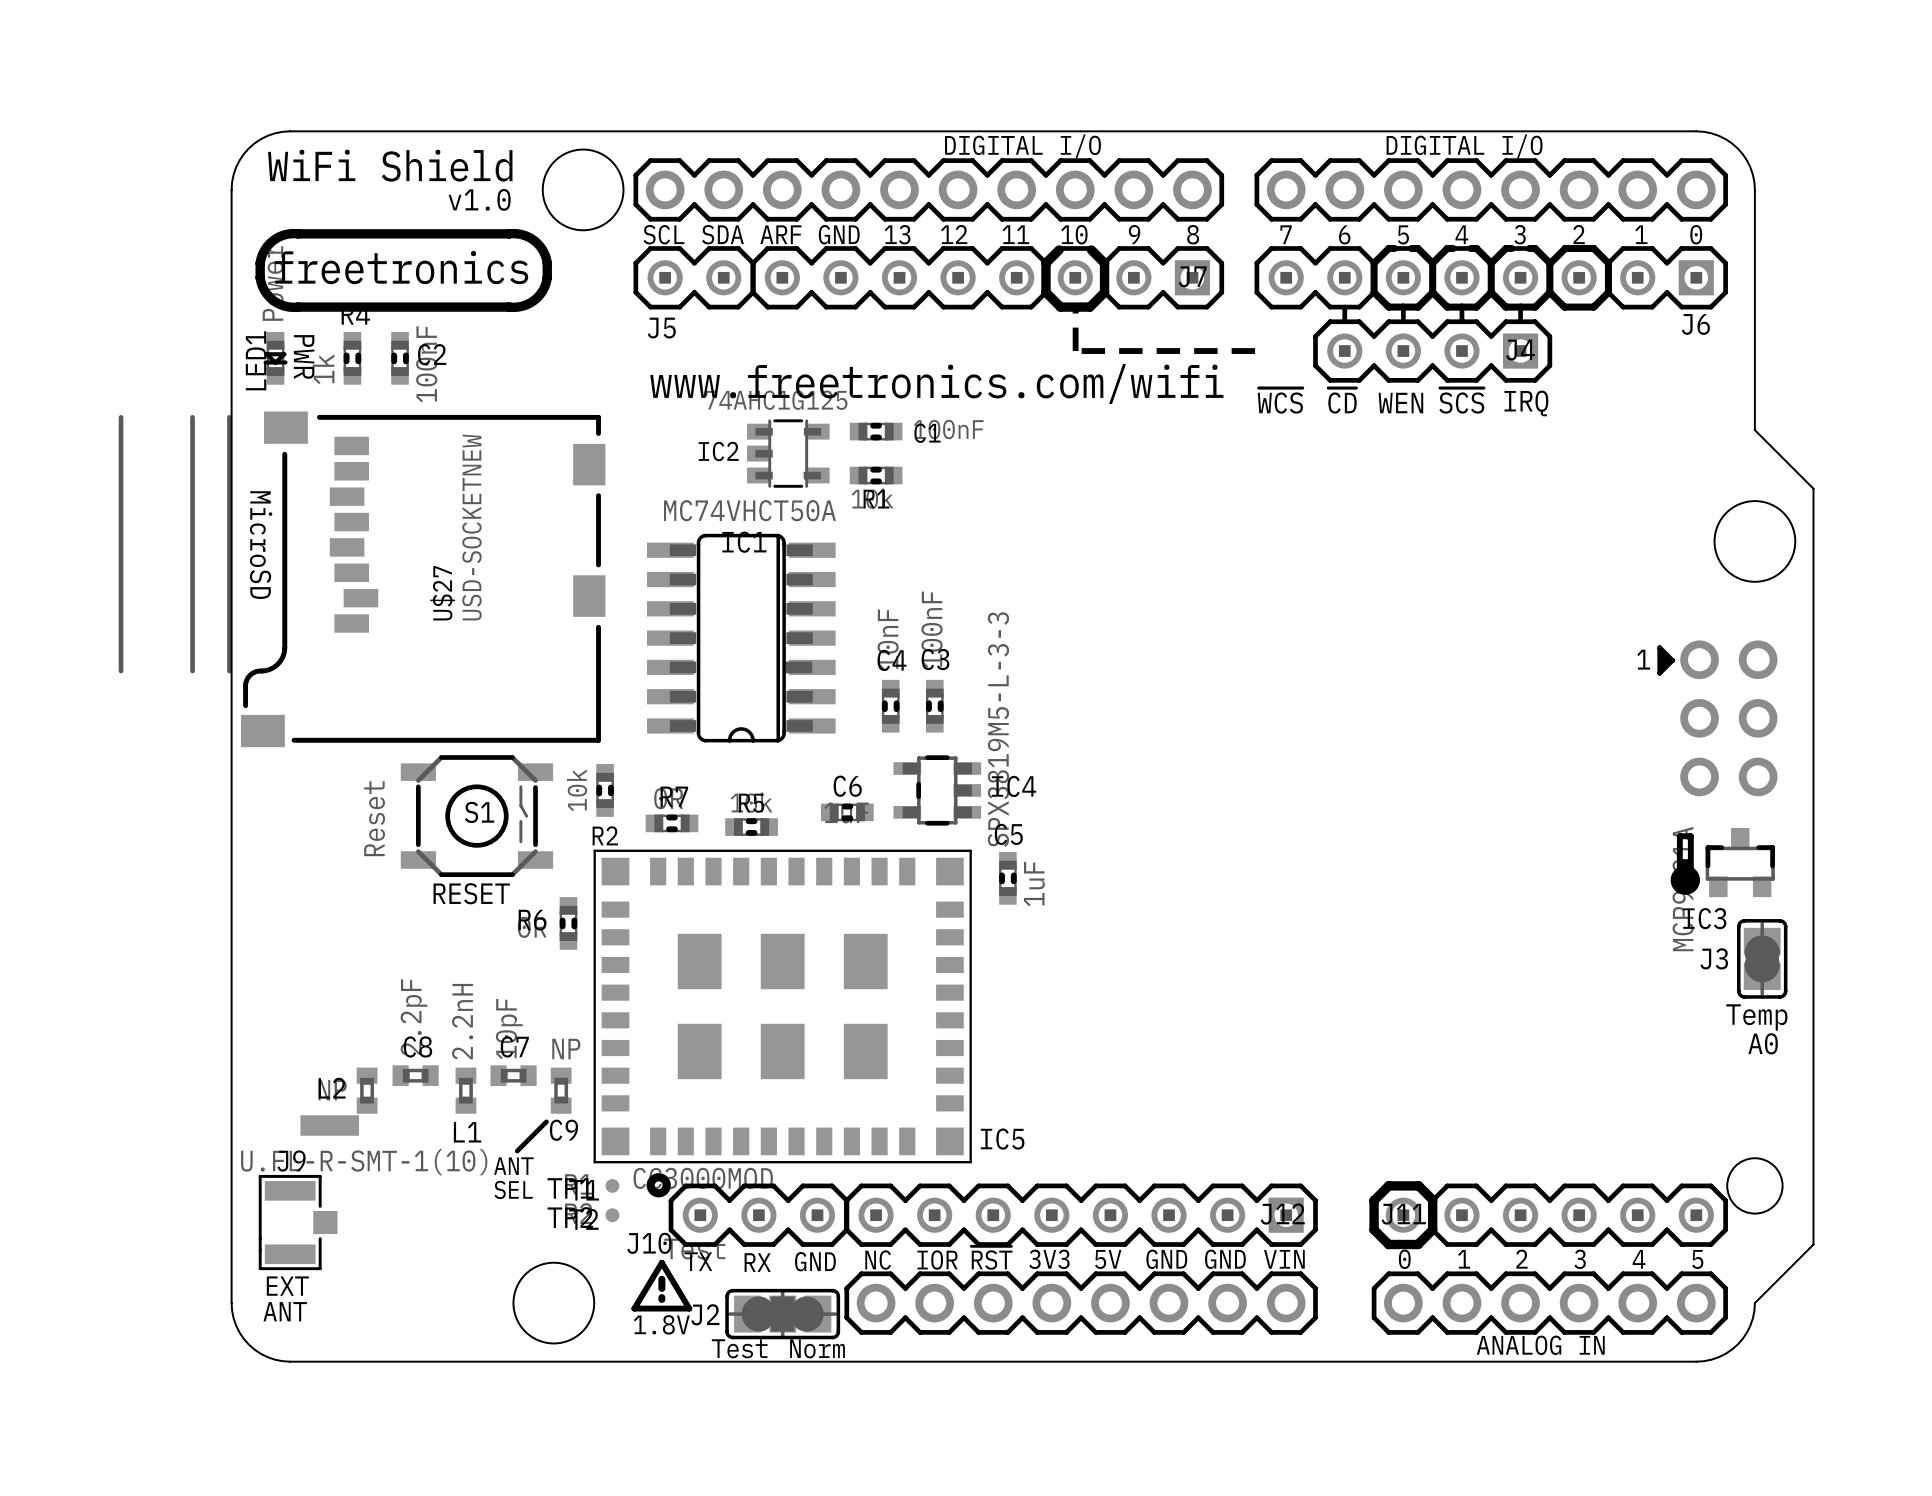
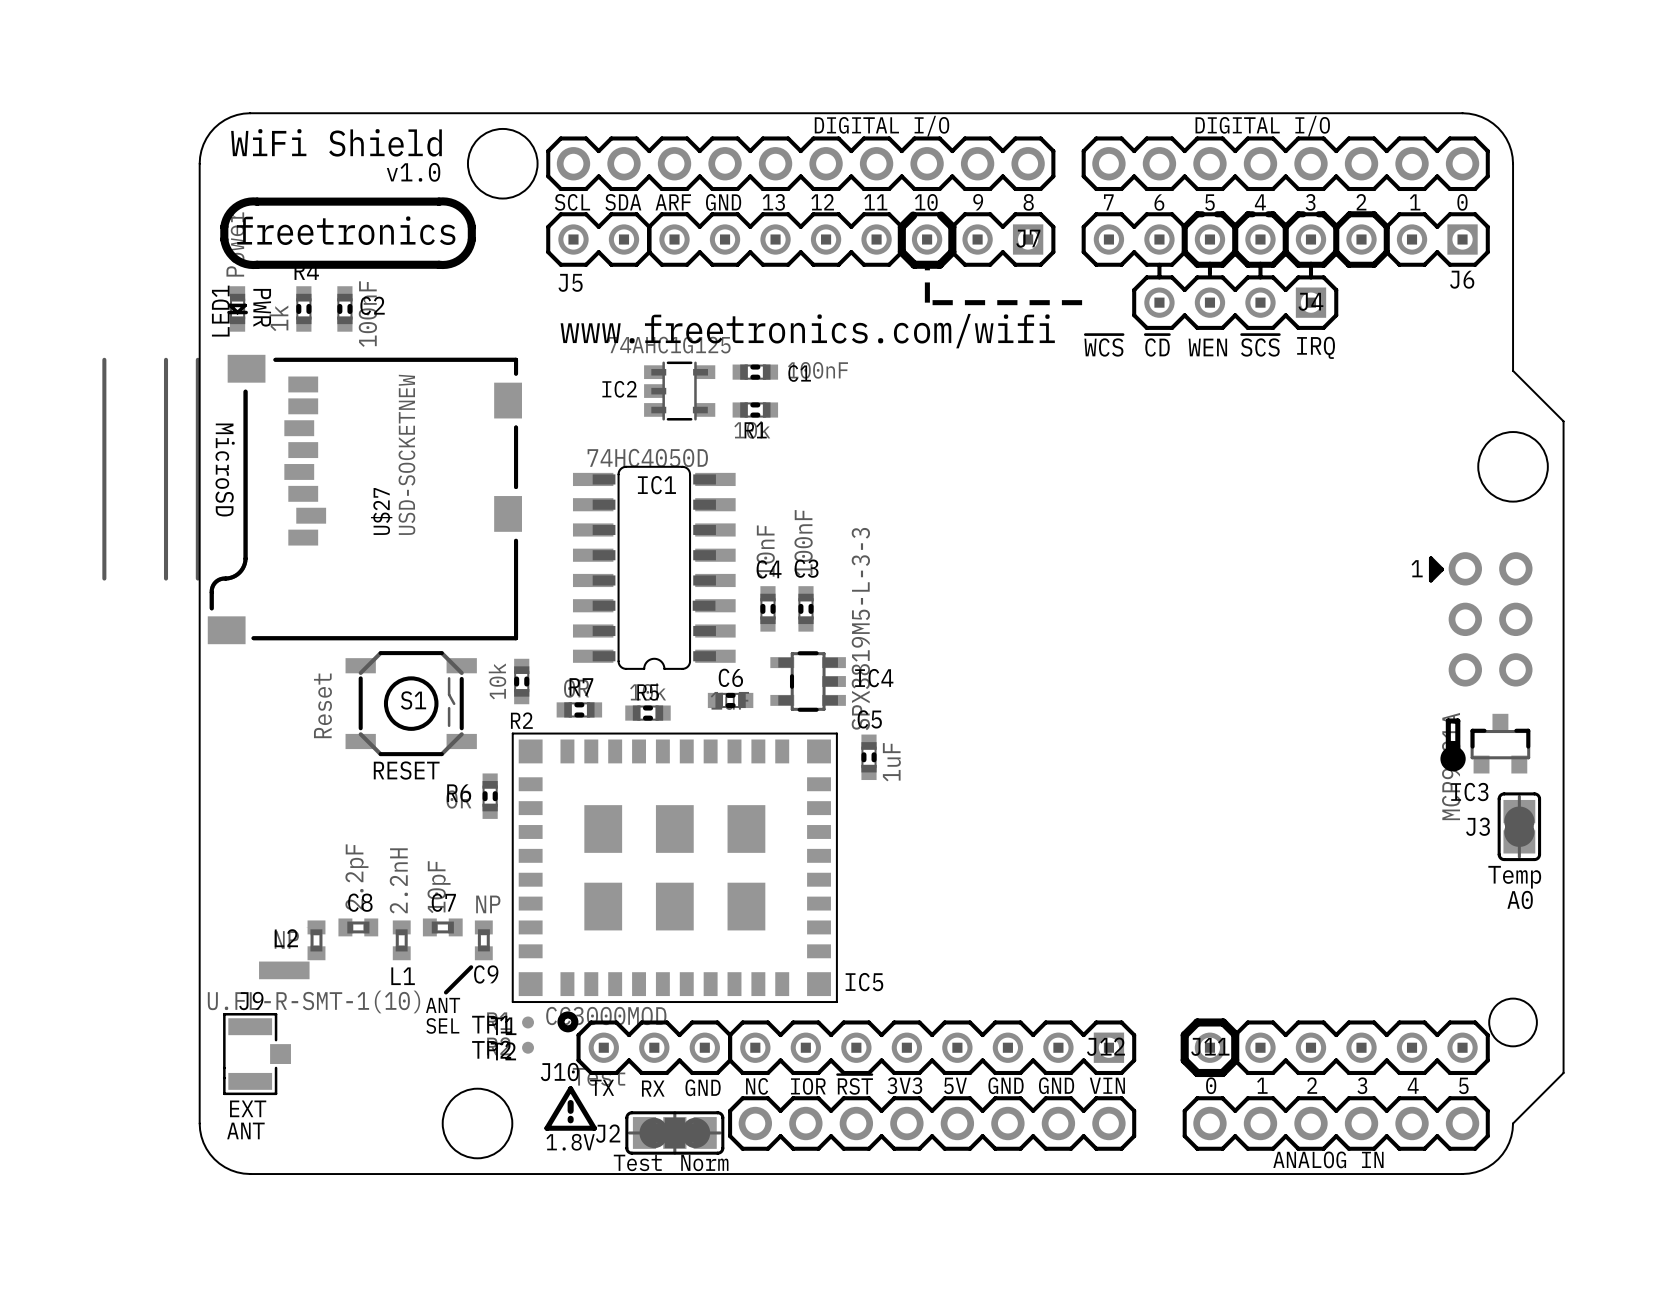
IC1 value: MC74VHCT50A (749, 510) -> 74HC4050D (647, 457)
IC1 footprint: [646, 533, 836, 743] -> [572, 465, 736, 670]

